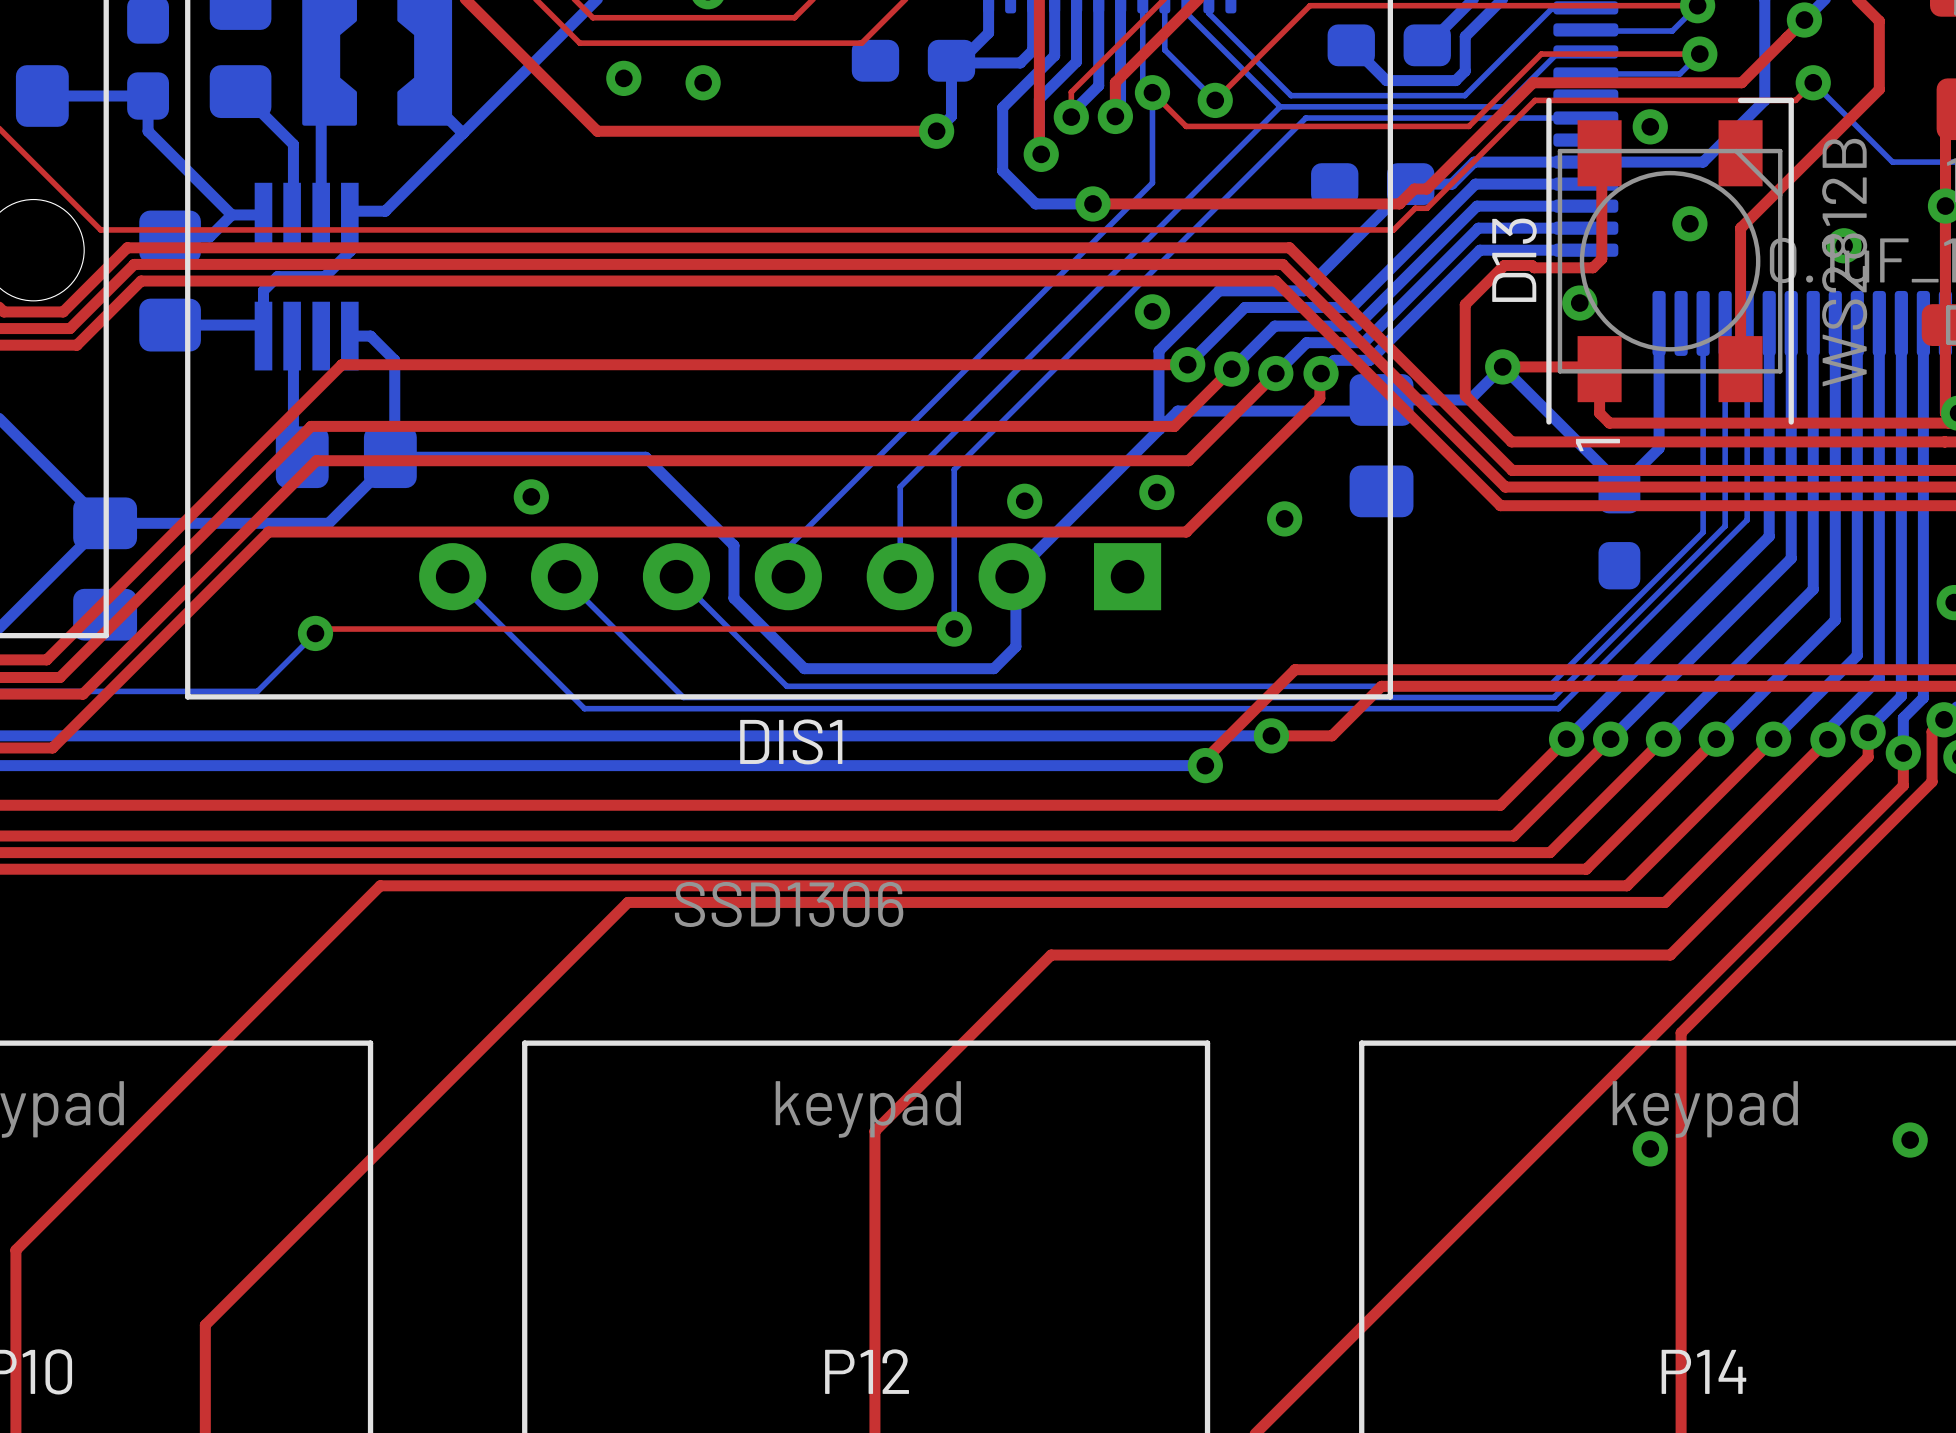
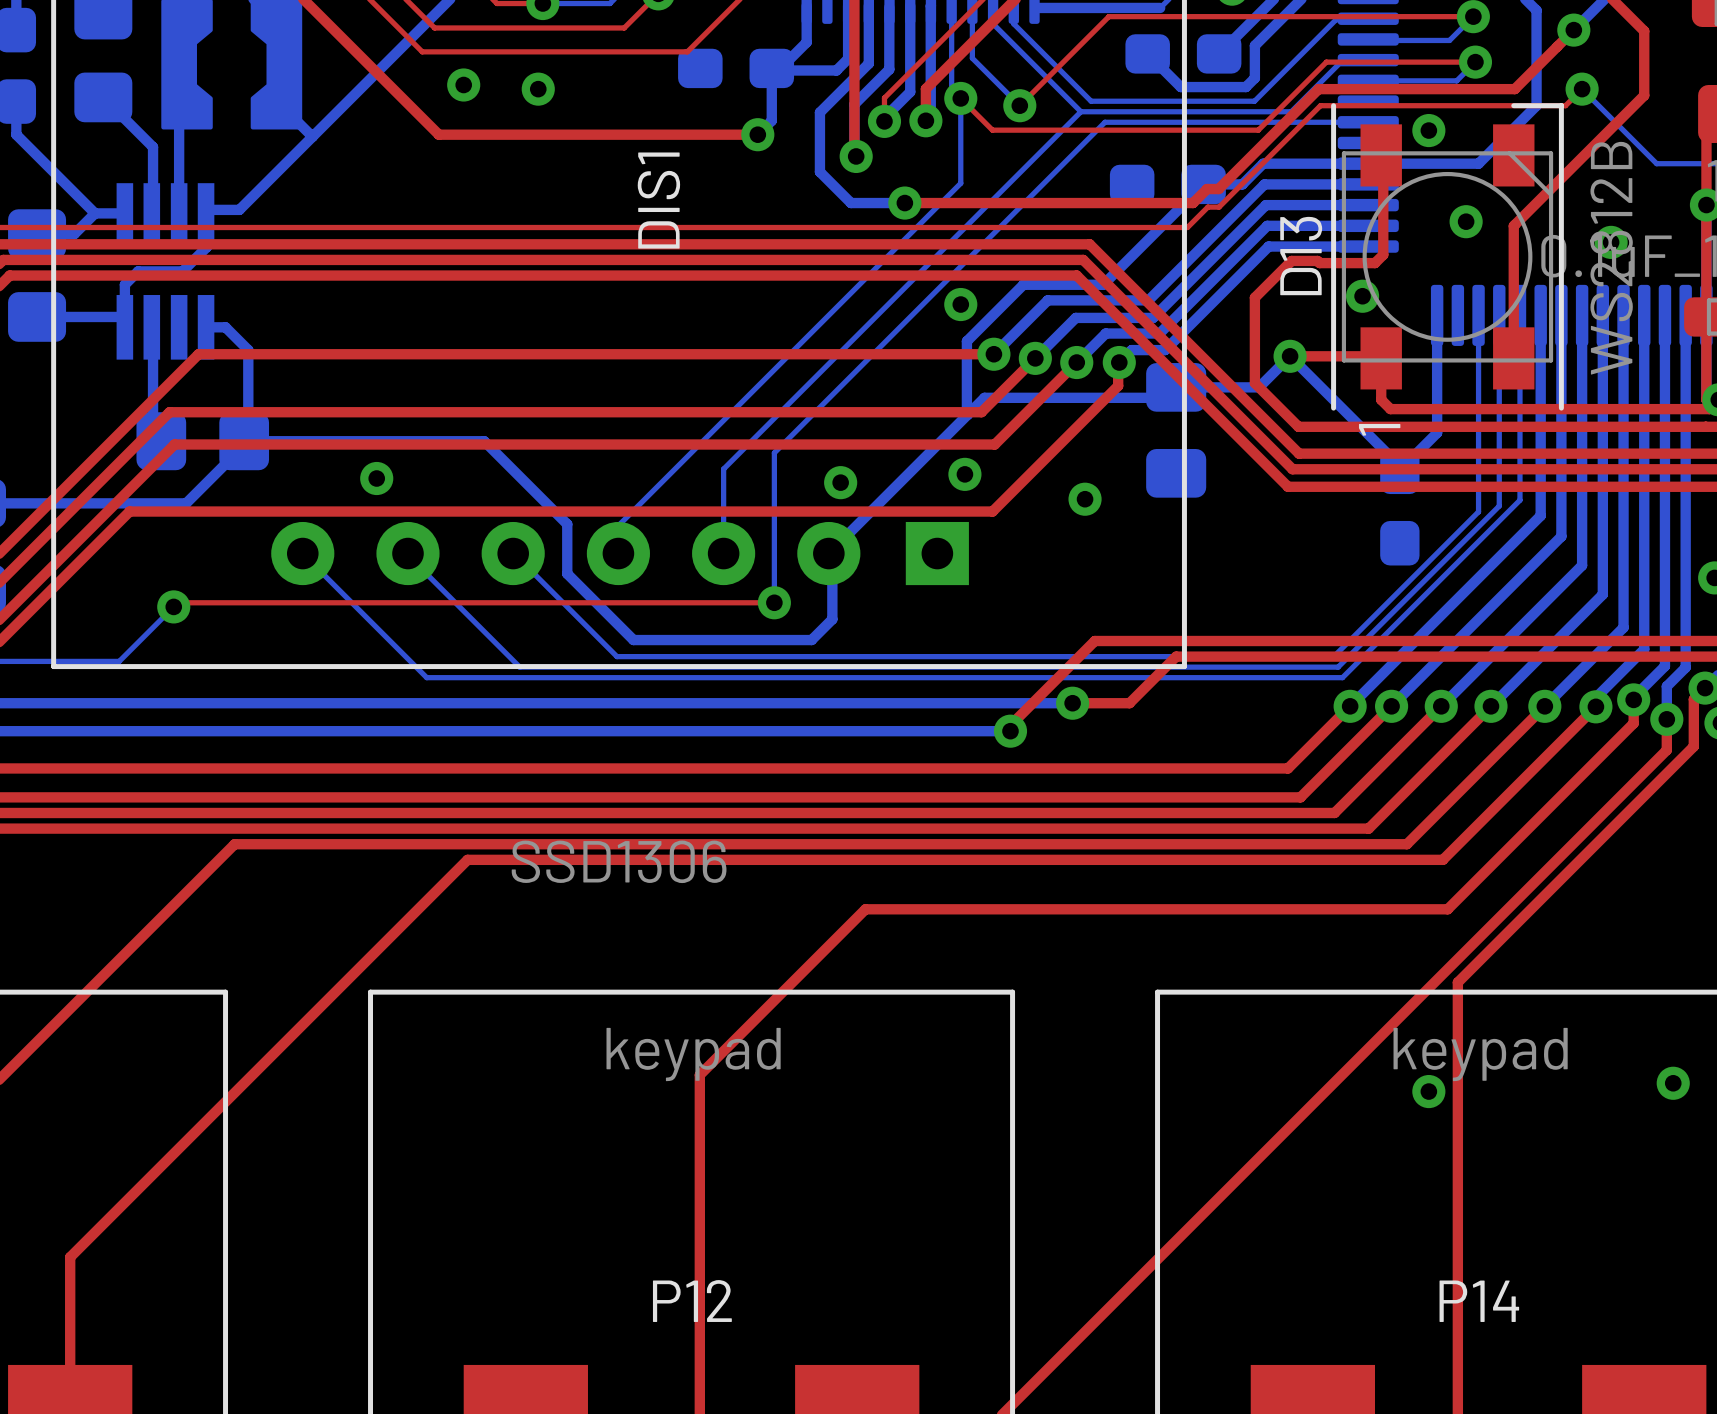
DIS1 name rotation: 0° (791, 741) -> 90° counterclockwise (658, 200)
DIS1 name position: DIS1 (791, 741) -> DIS1 (658, 200)

